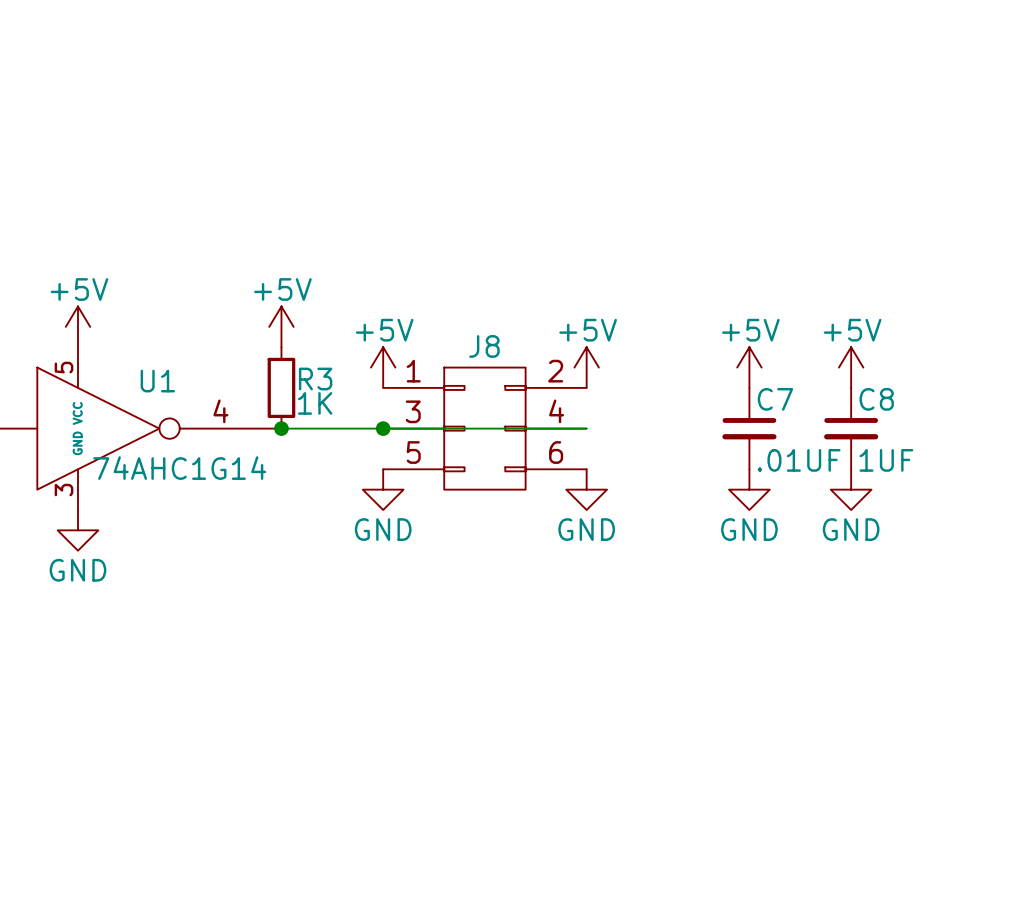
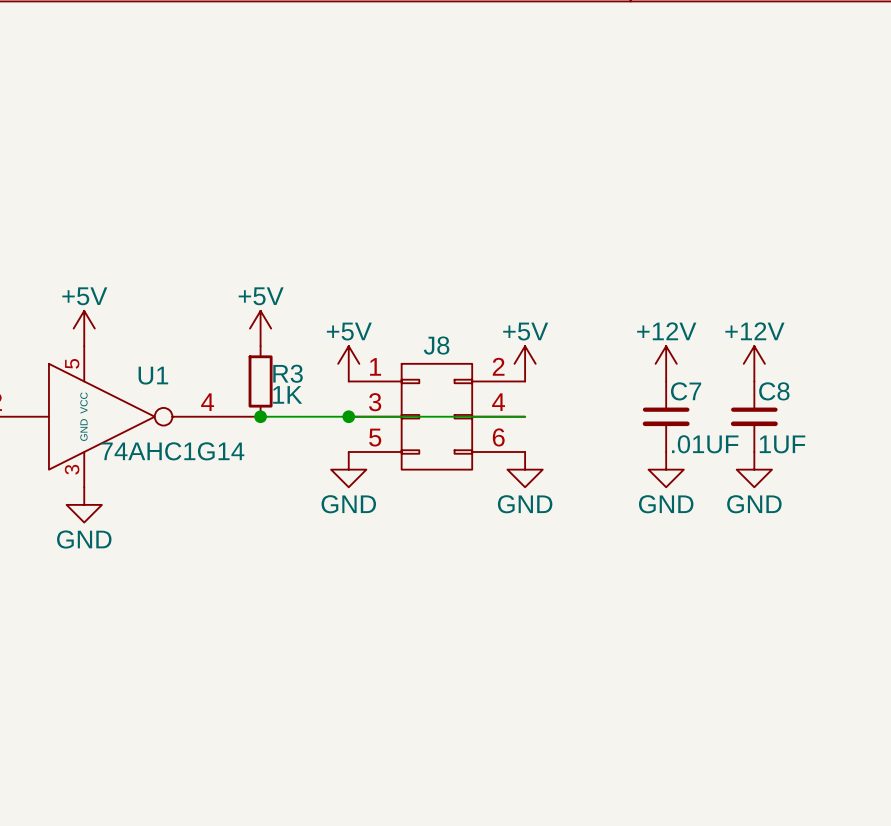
power symbol: +5V (749, 367) -> +12V (666, 363)
power symbol: +5V (851, 367) -> +12V (754, 363)

